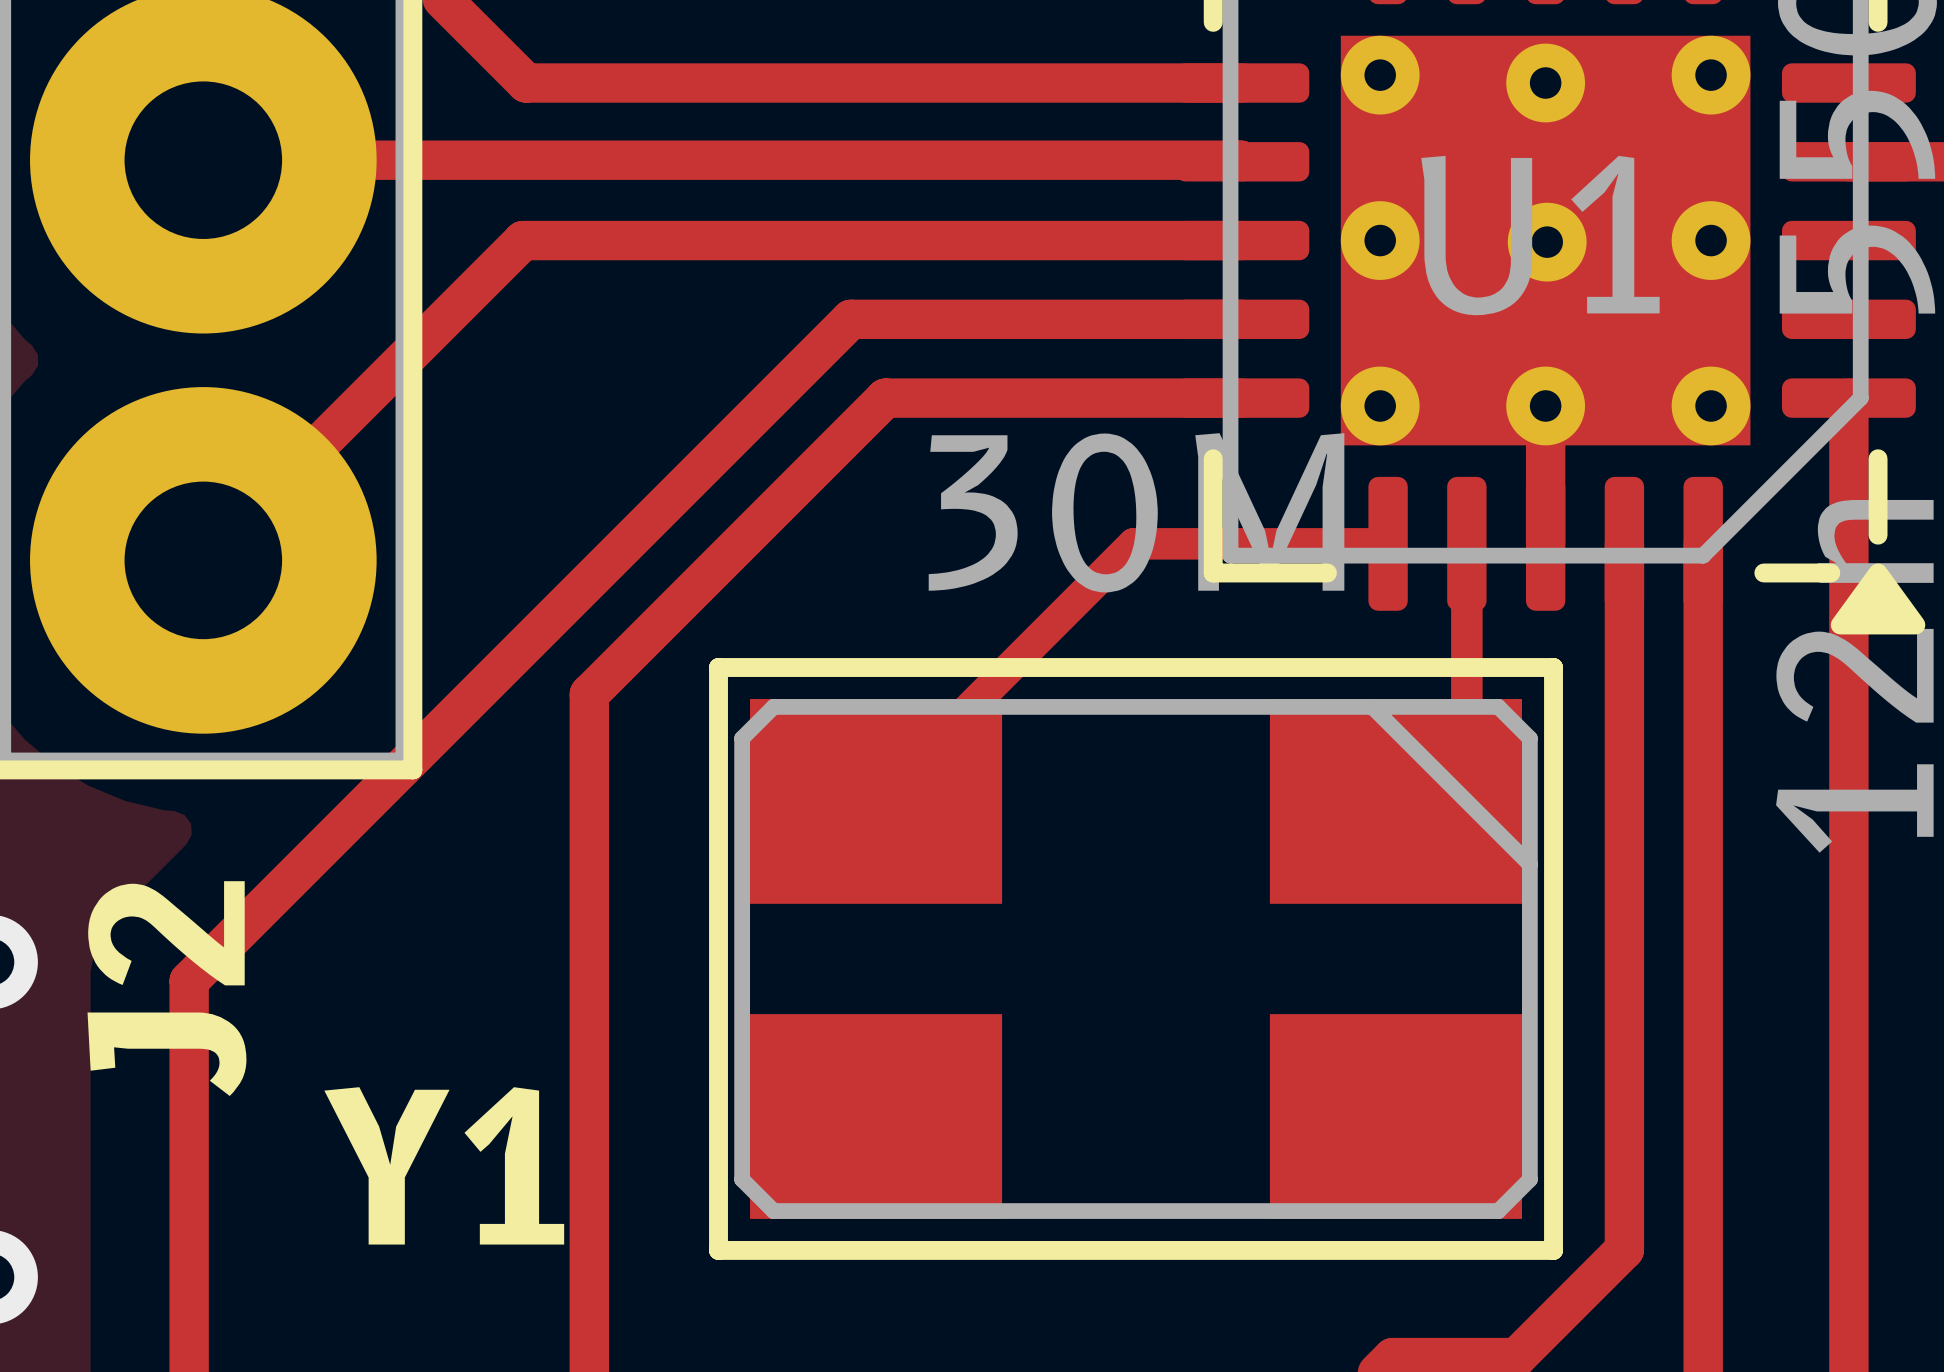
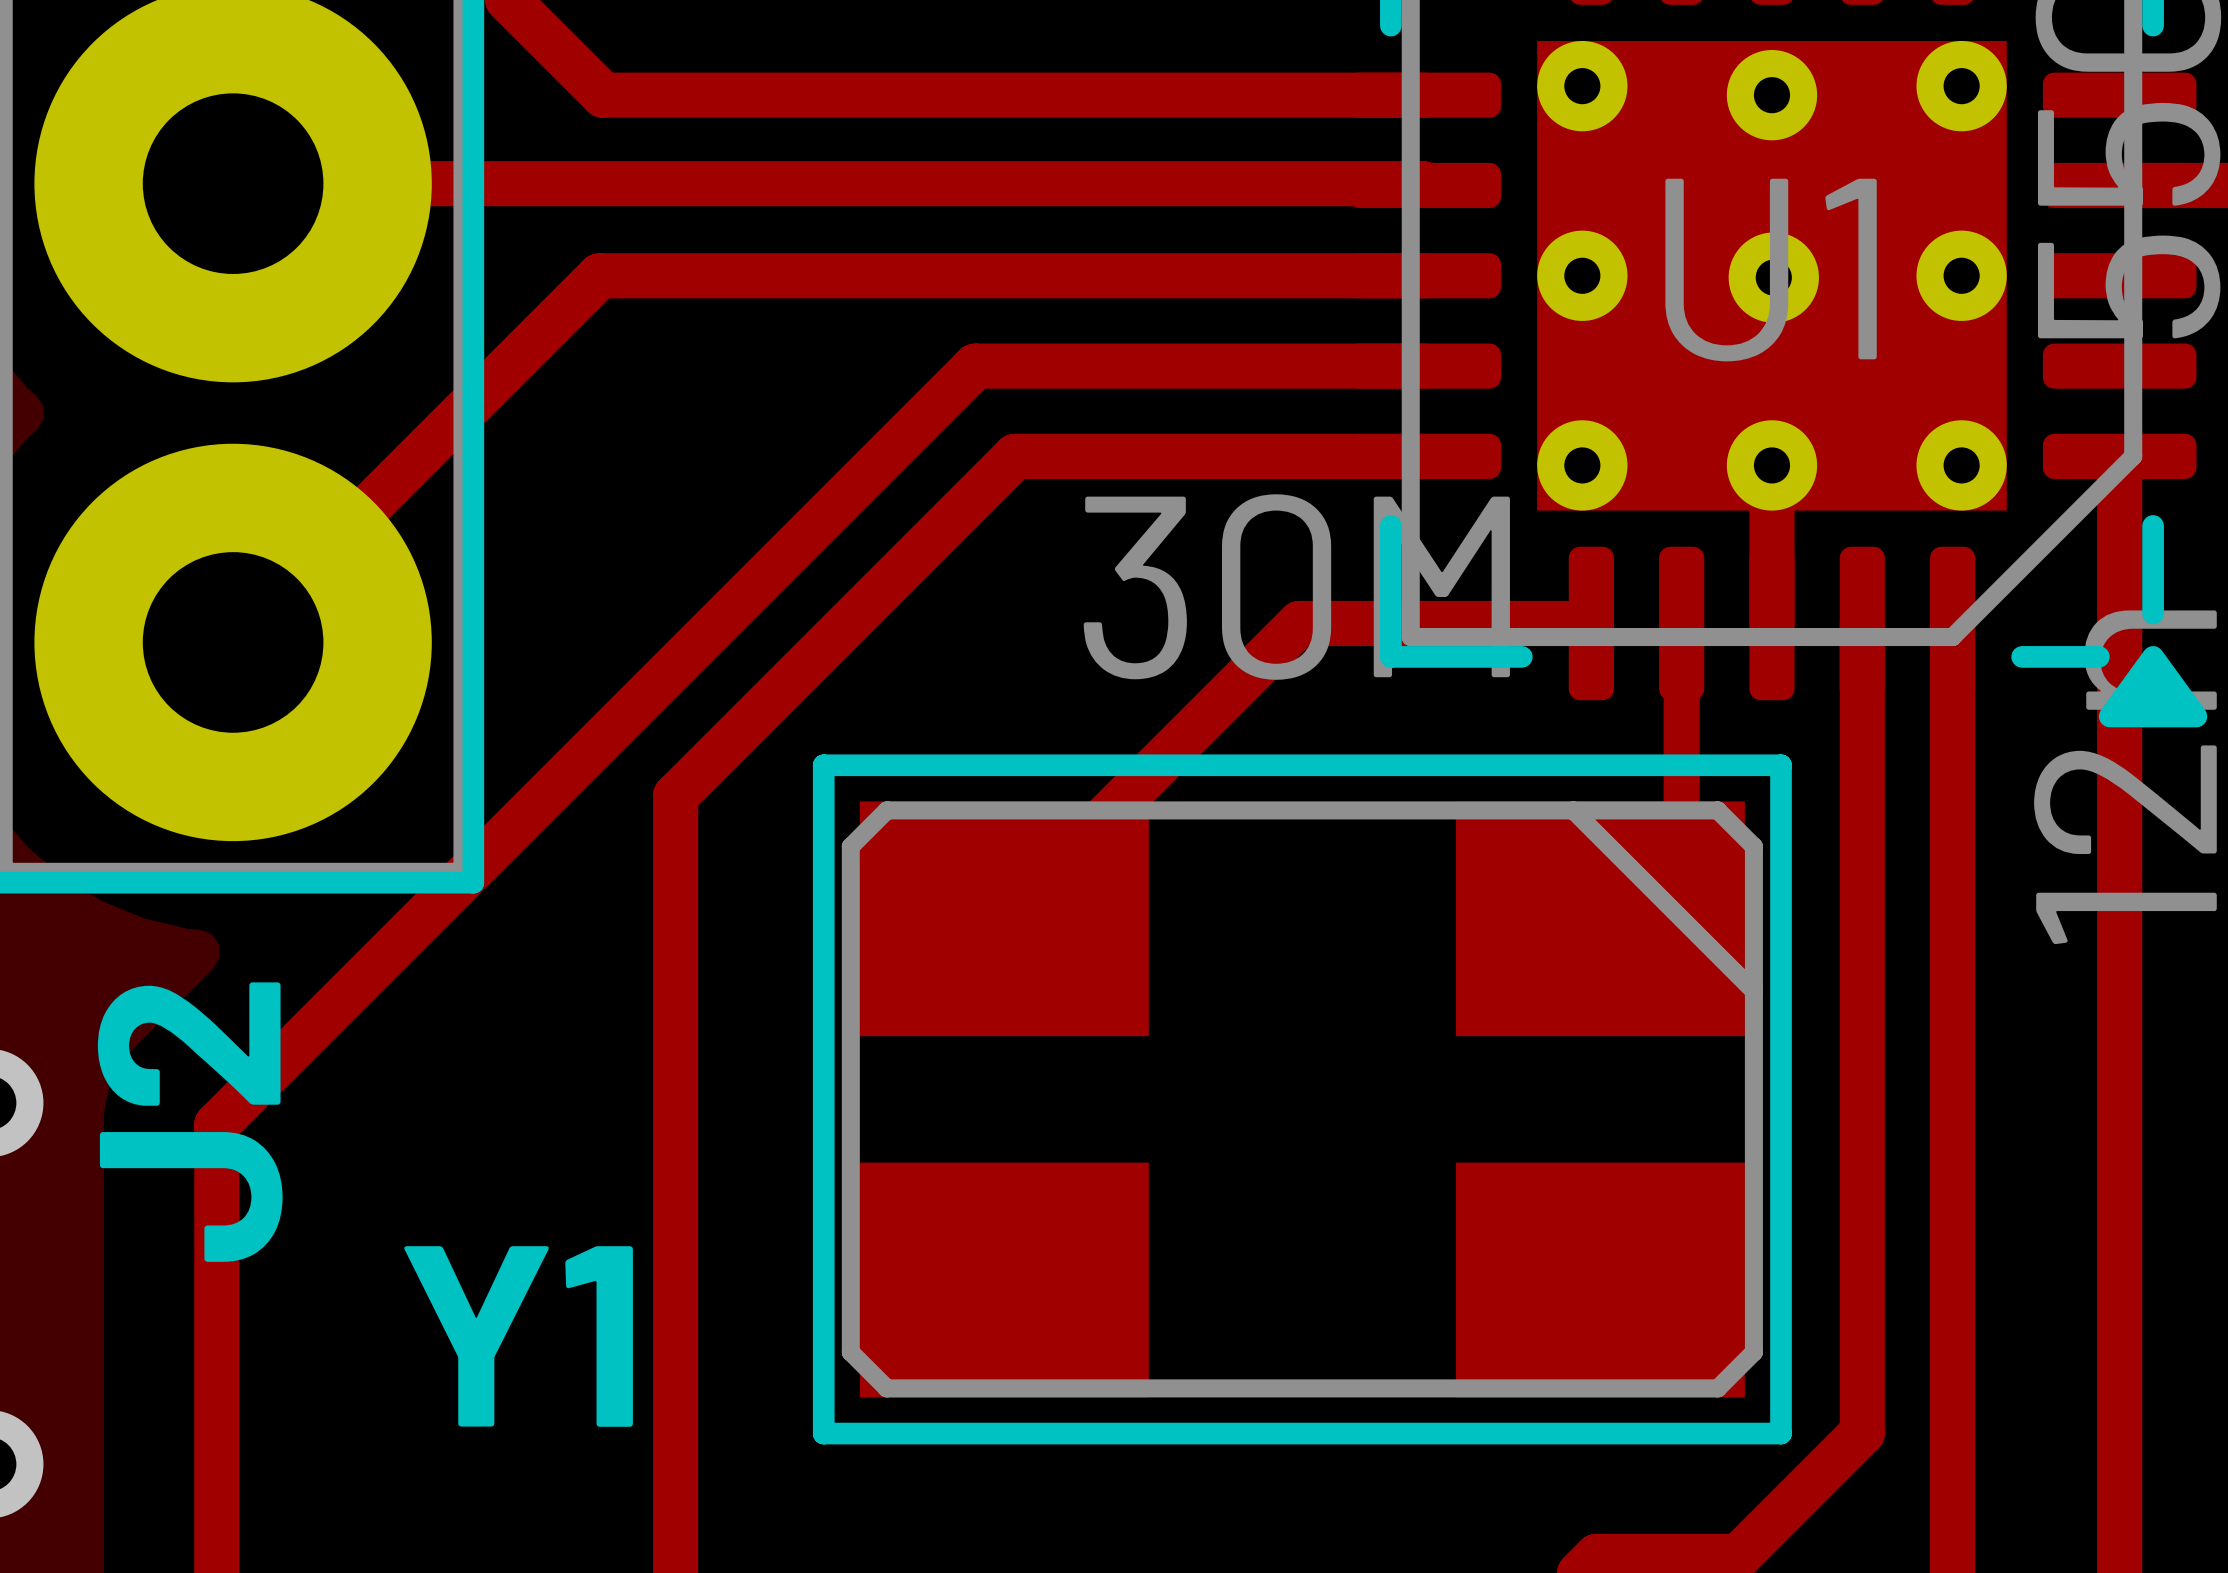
track width: thin (1388, 543) (1133, 543) (876, 801) -> thick (1591, 623) (1299, 623) (1004, 918)

